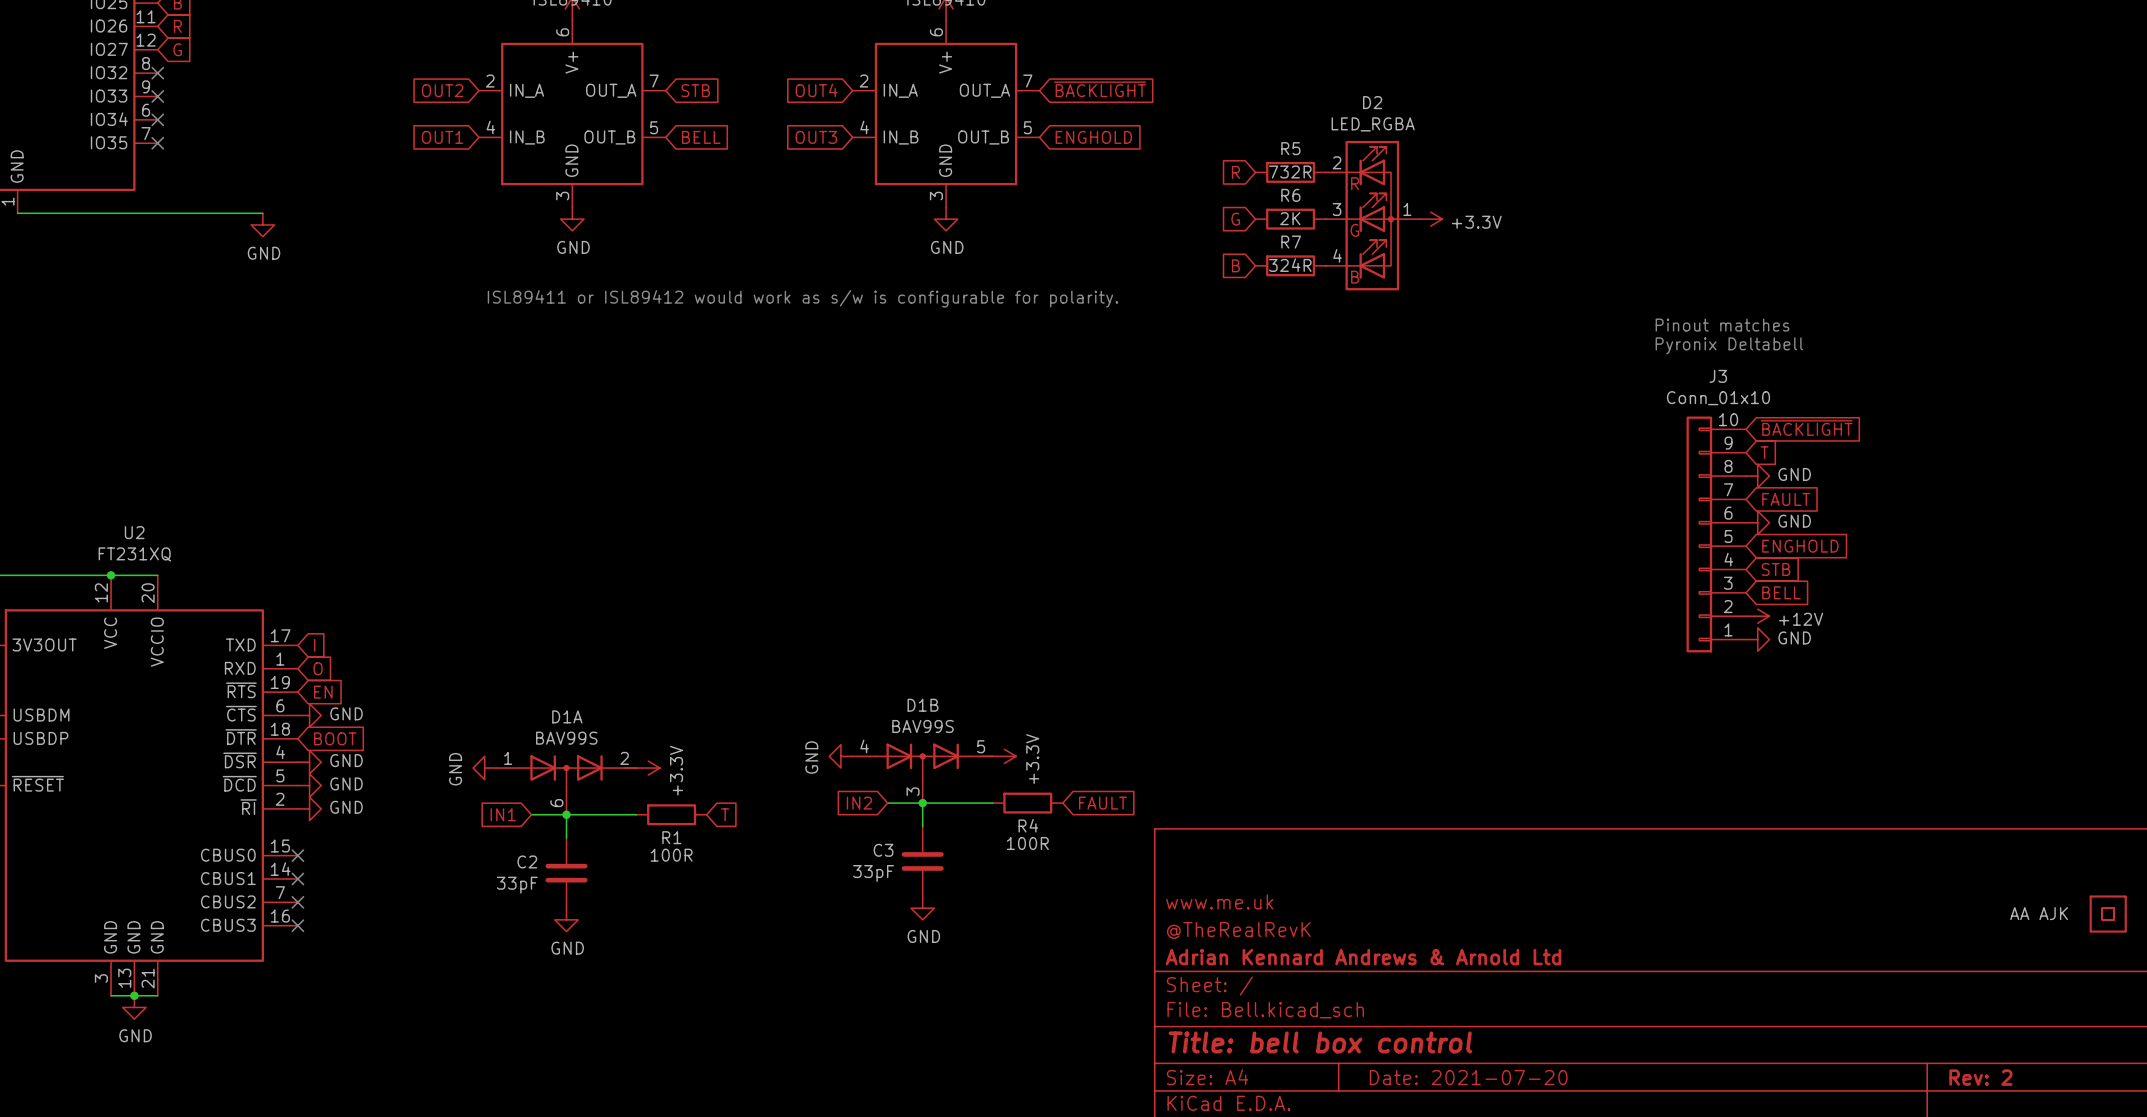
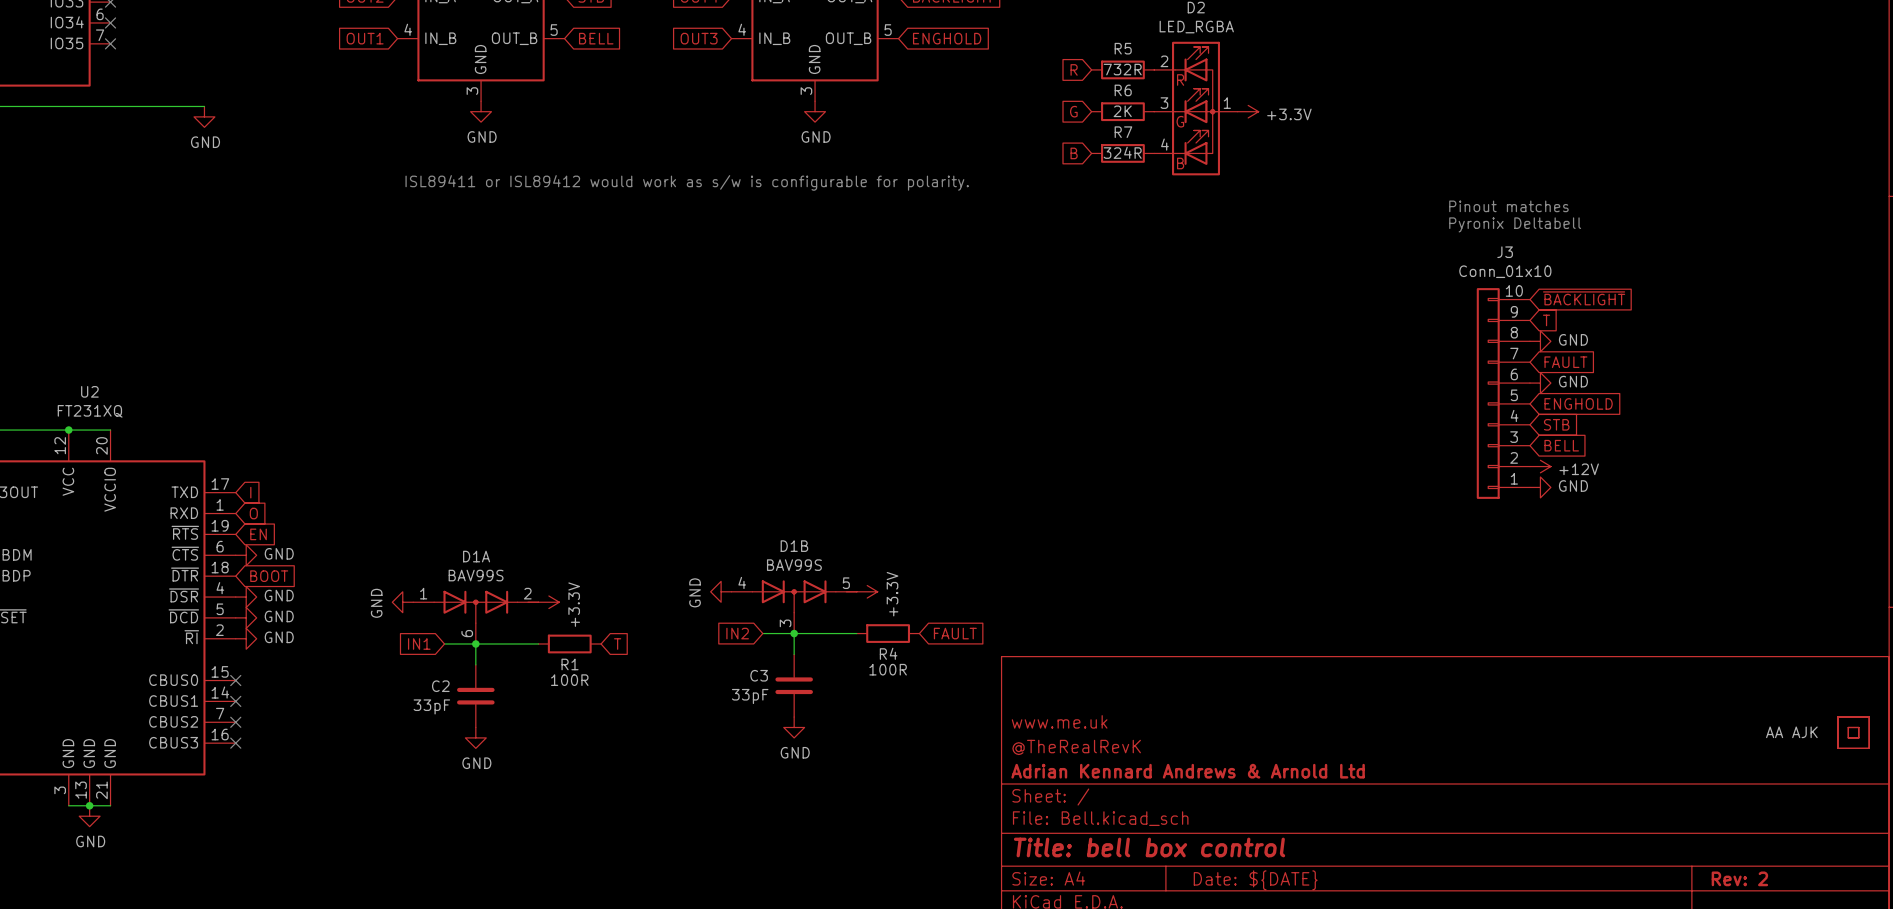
title block: Date: 2021-07-20 (1468, 1077) -> Date: ${DATE} (1255, 880)

